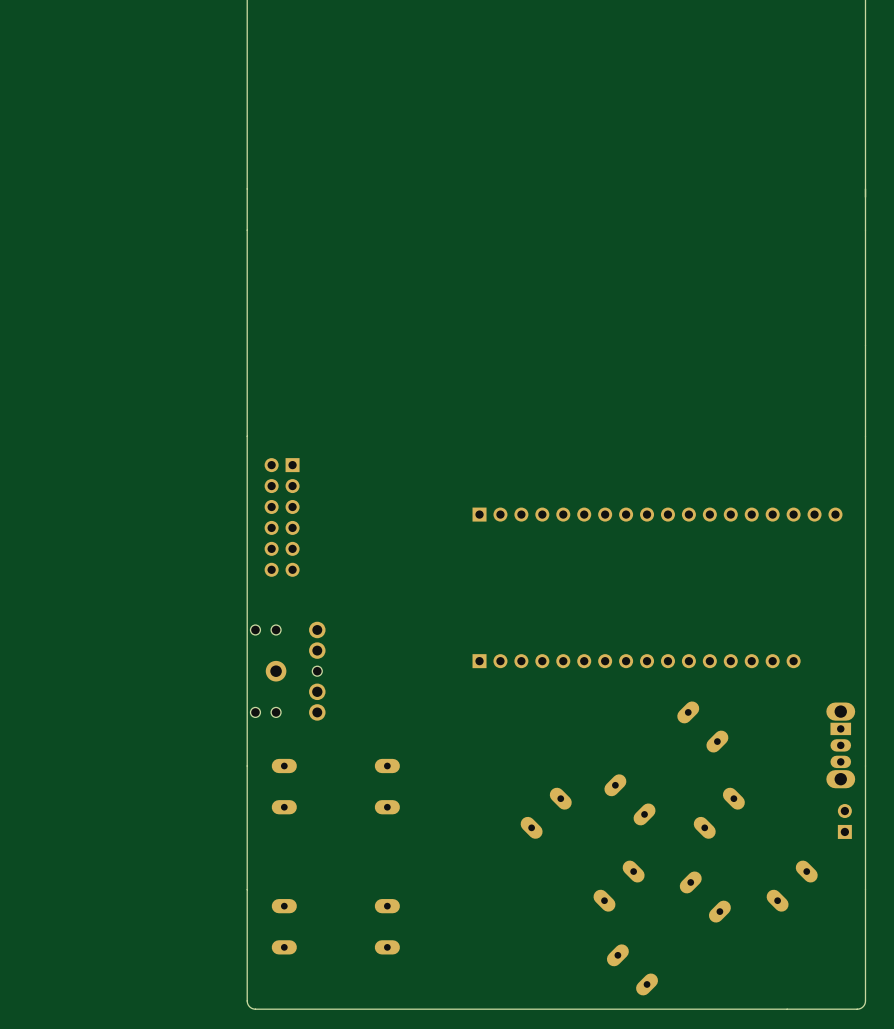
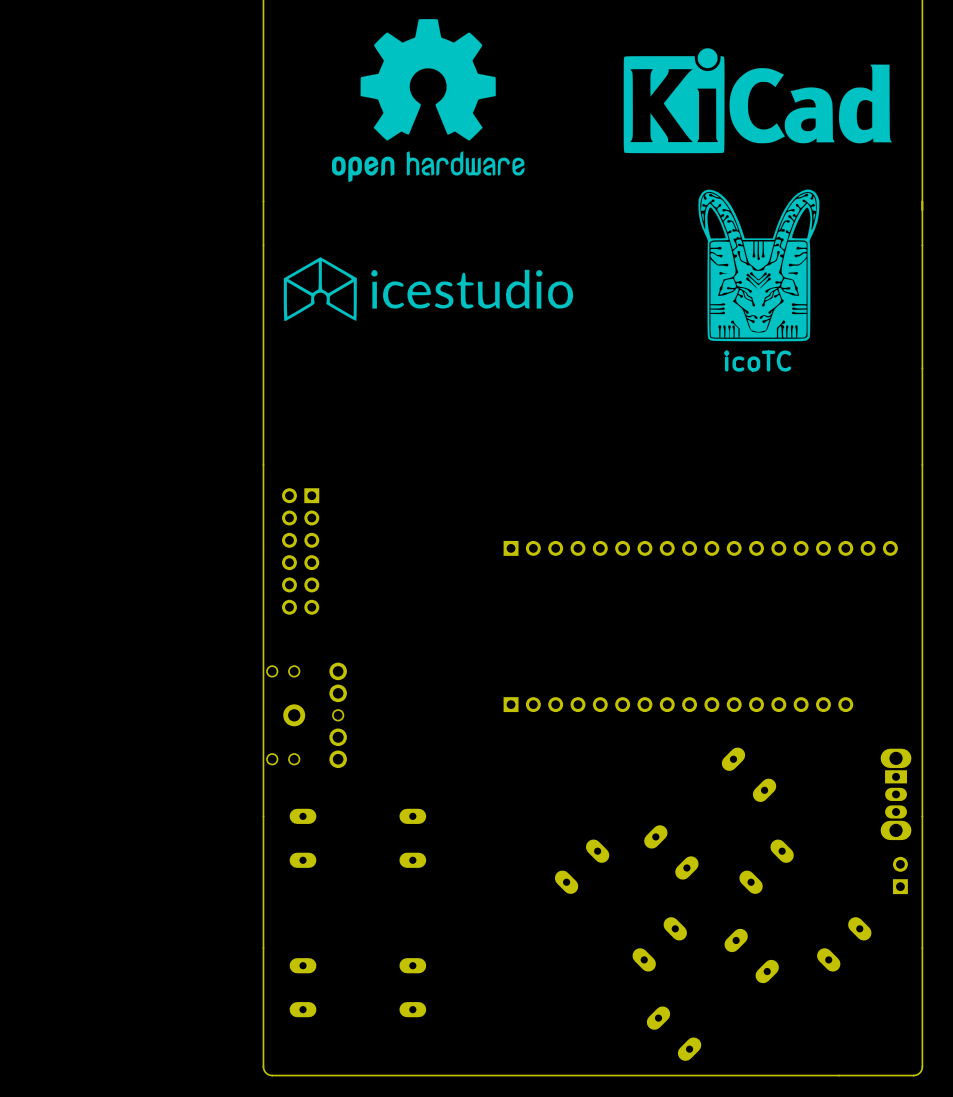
drawing: none -> [331, 19, 525, 183]
drawing: none -> [623, 48, 892, 154]
drawing: none -> [698, 189, 820, 342]
drawing: none -> [283, 257, 574, 322]
text: none -> icoTC (757, 361)

